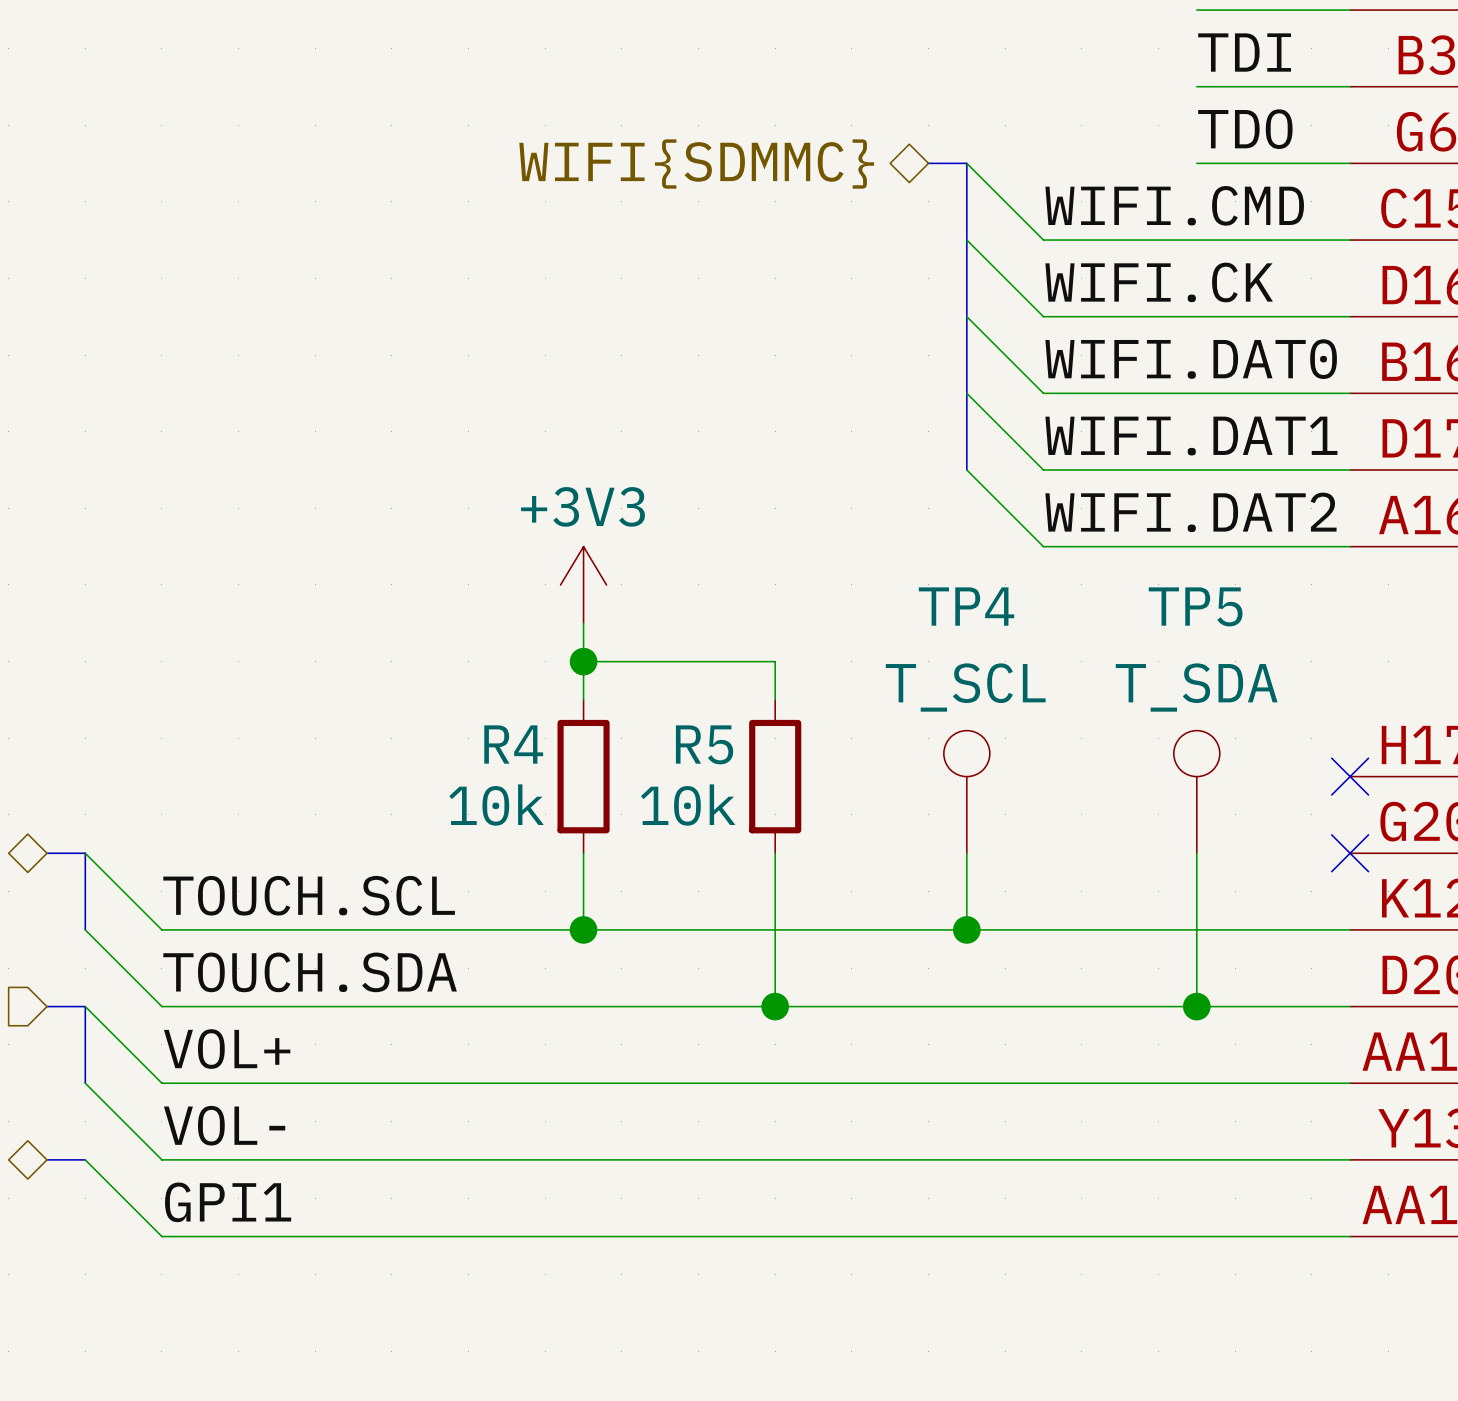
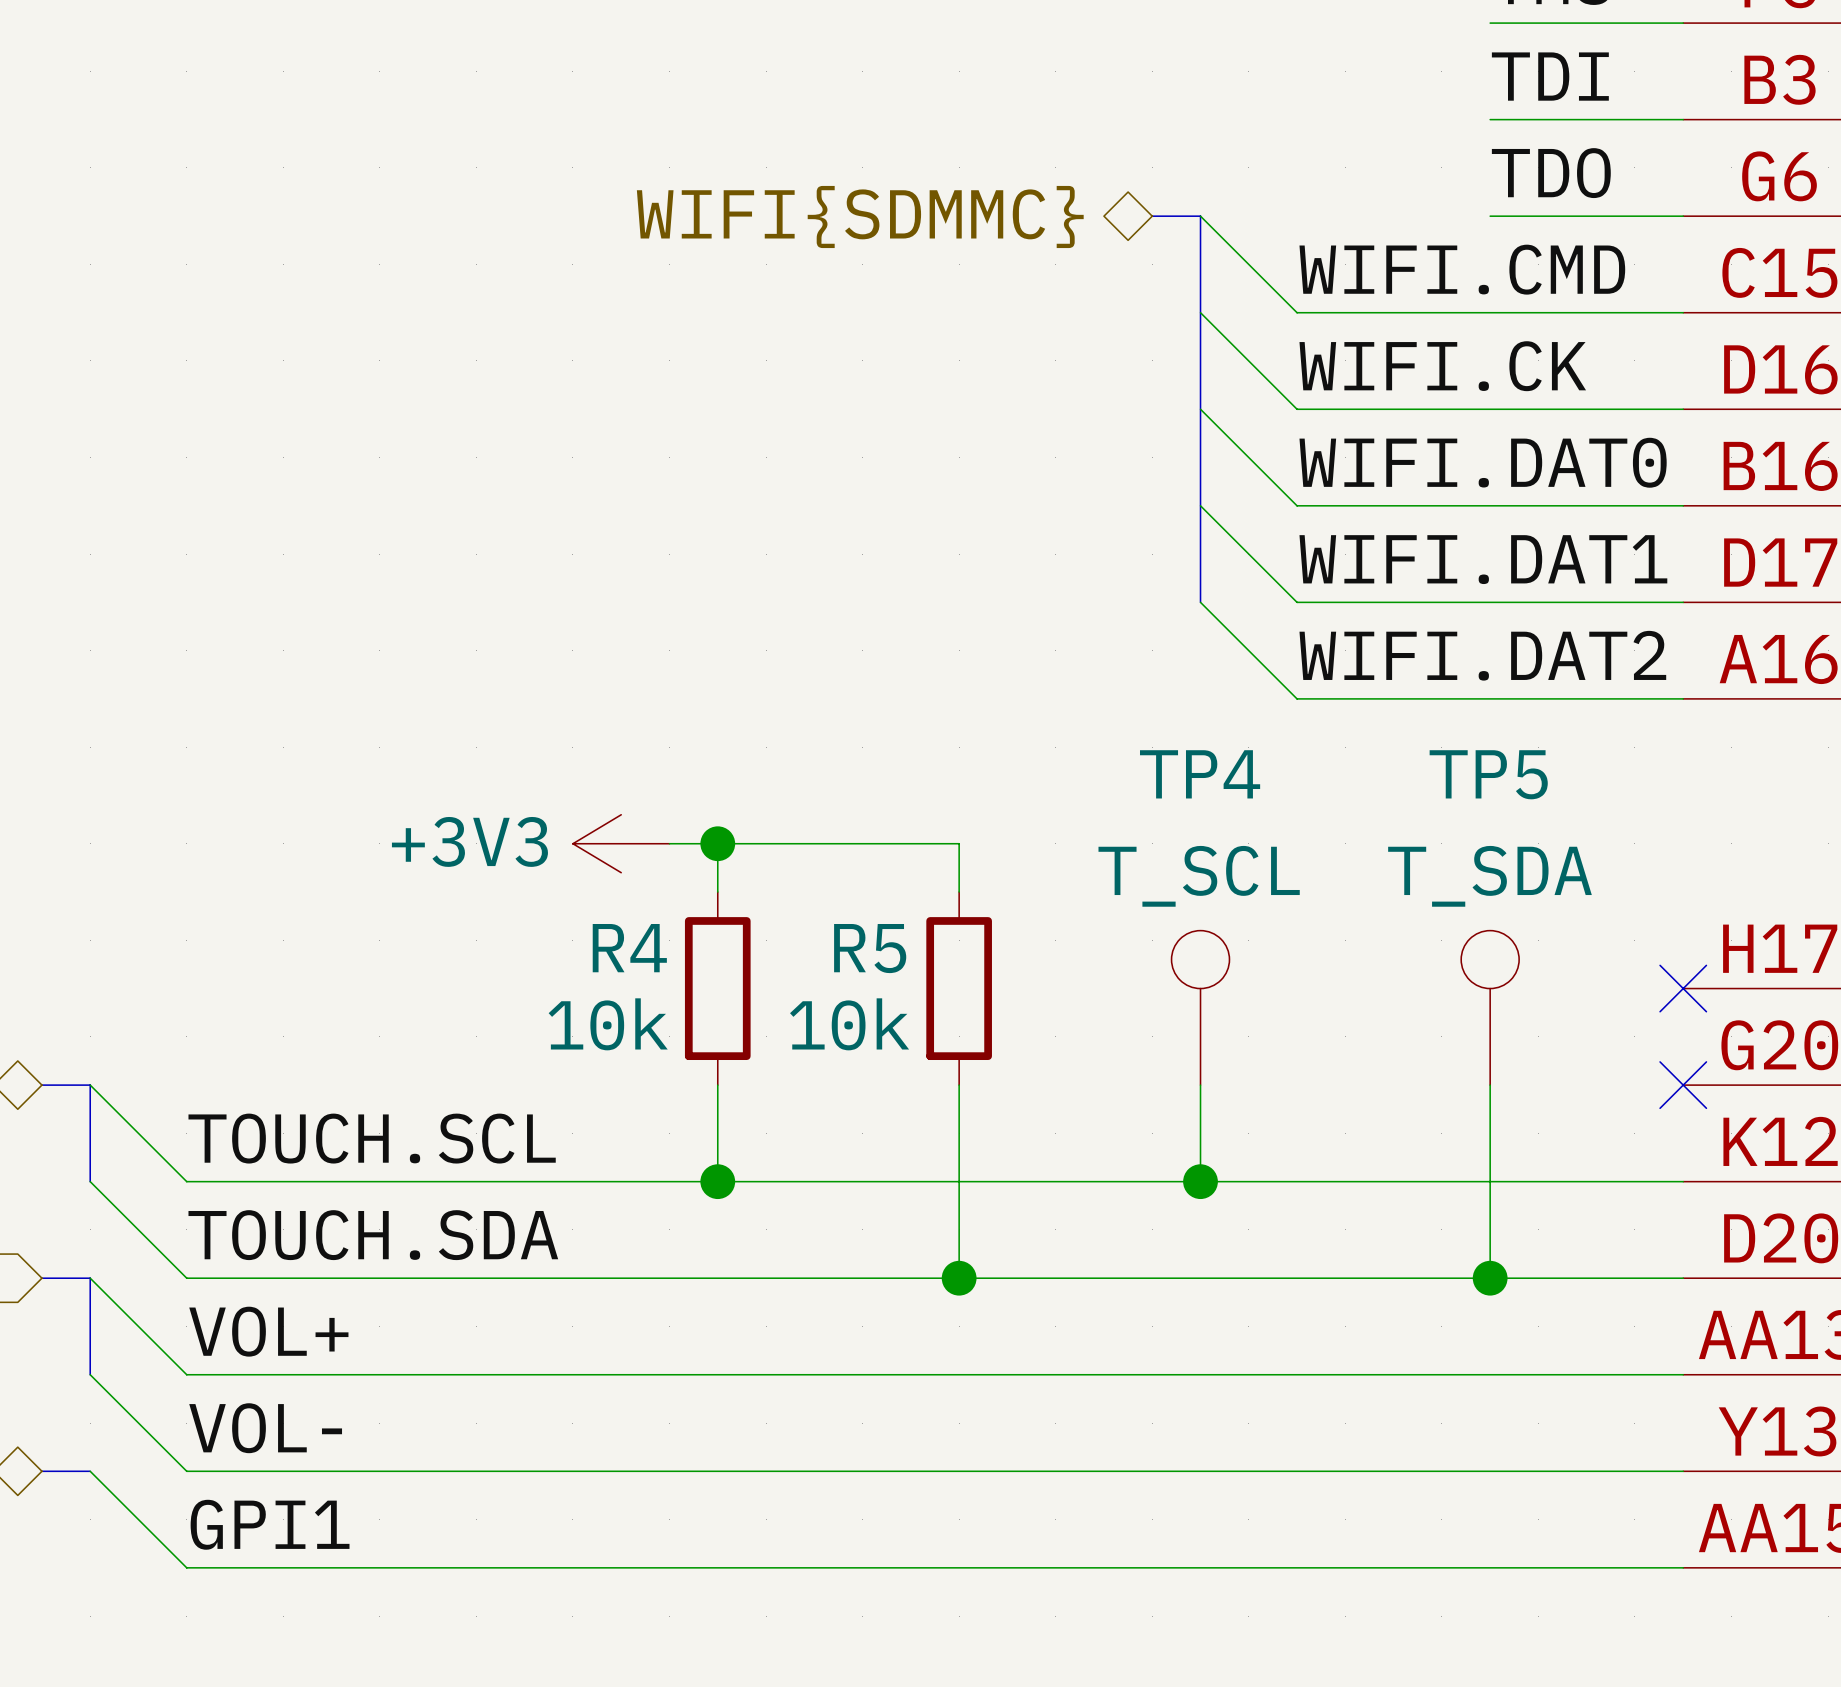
power symbol text position: +3V3 (583, 506) -> +3V3 (469, 841)
power symbol rotation: 0° (583, 584) -> 90° counterclockwise (621, 843)
power symbol position: +3V3 (583, 584) -> +3V3 (621, 843)
wire: (583, 623) (583, 661) -> (669, 843) (717, 843)

